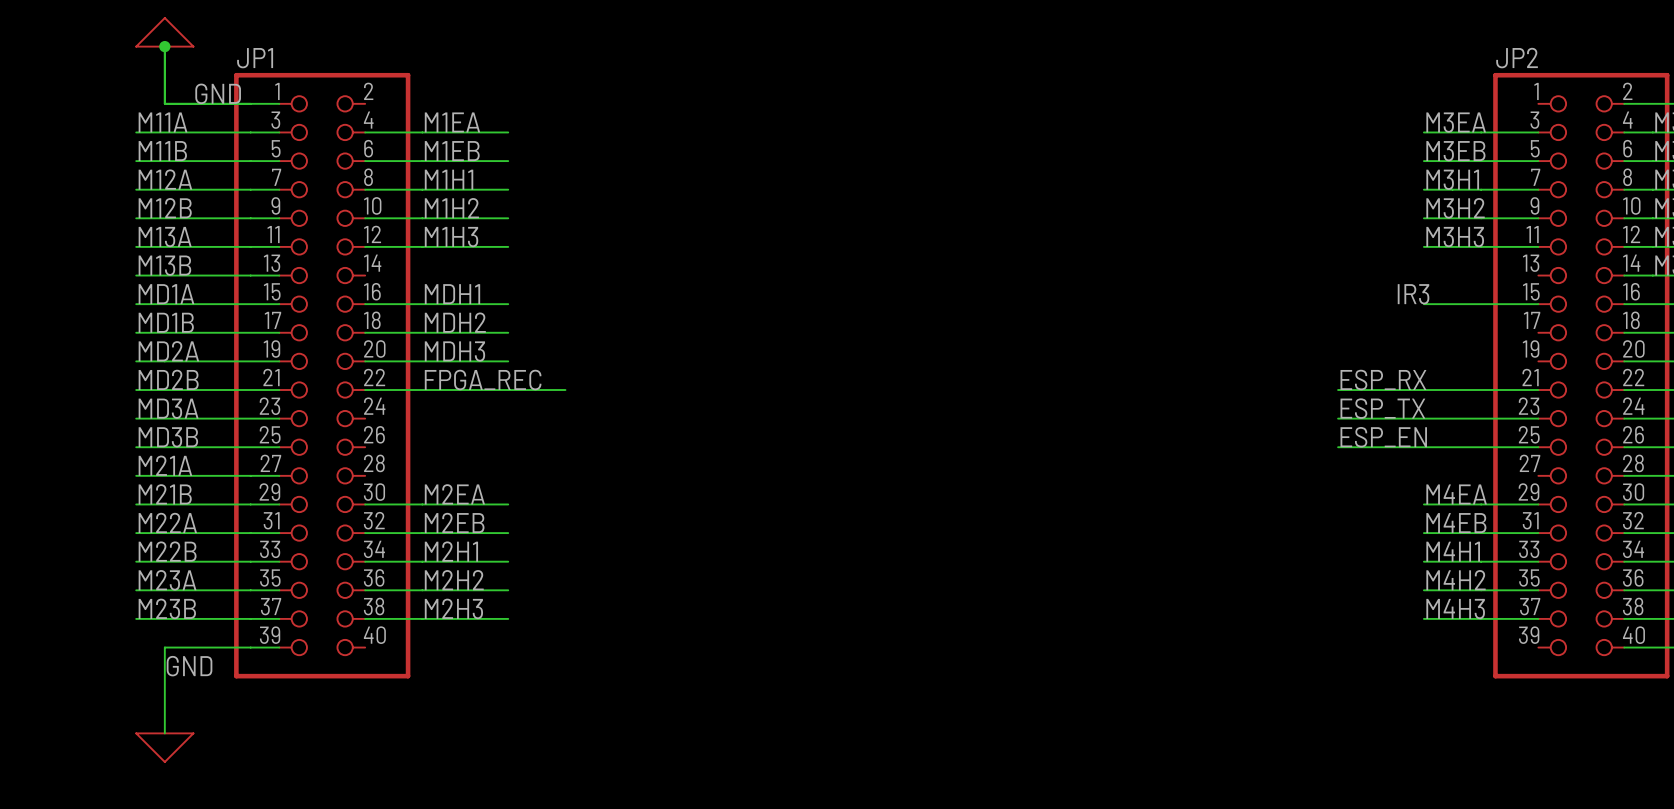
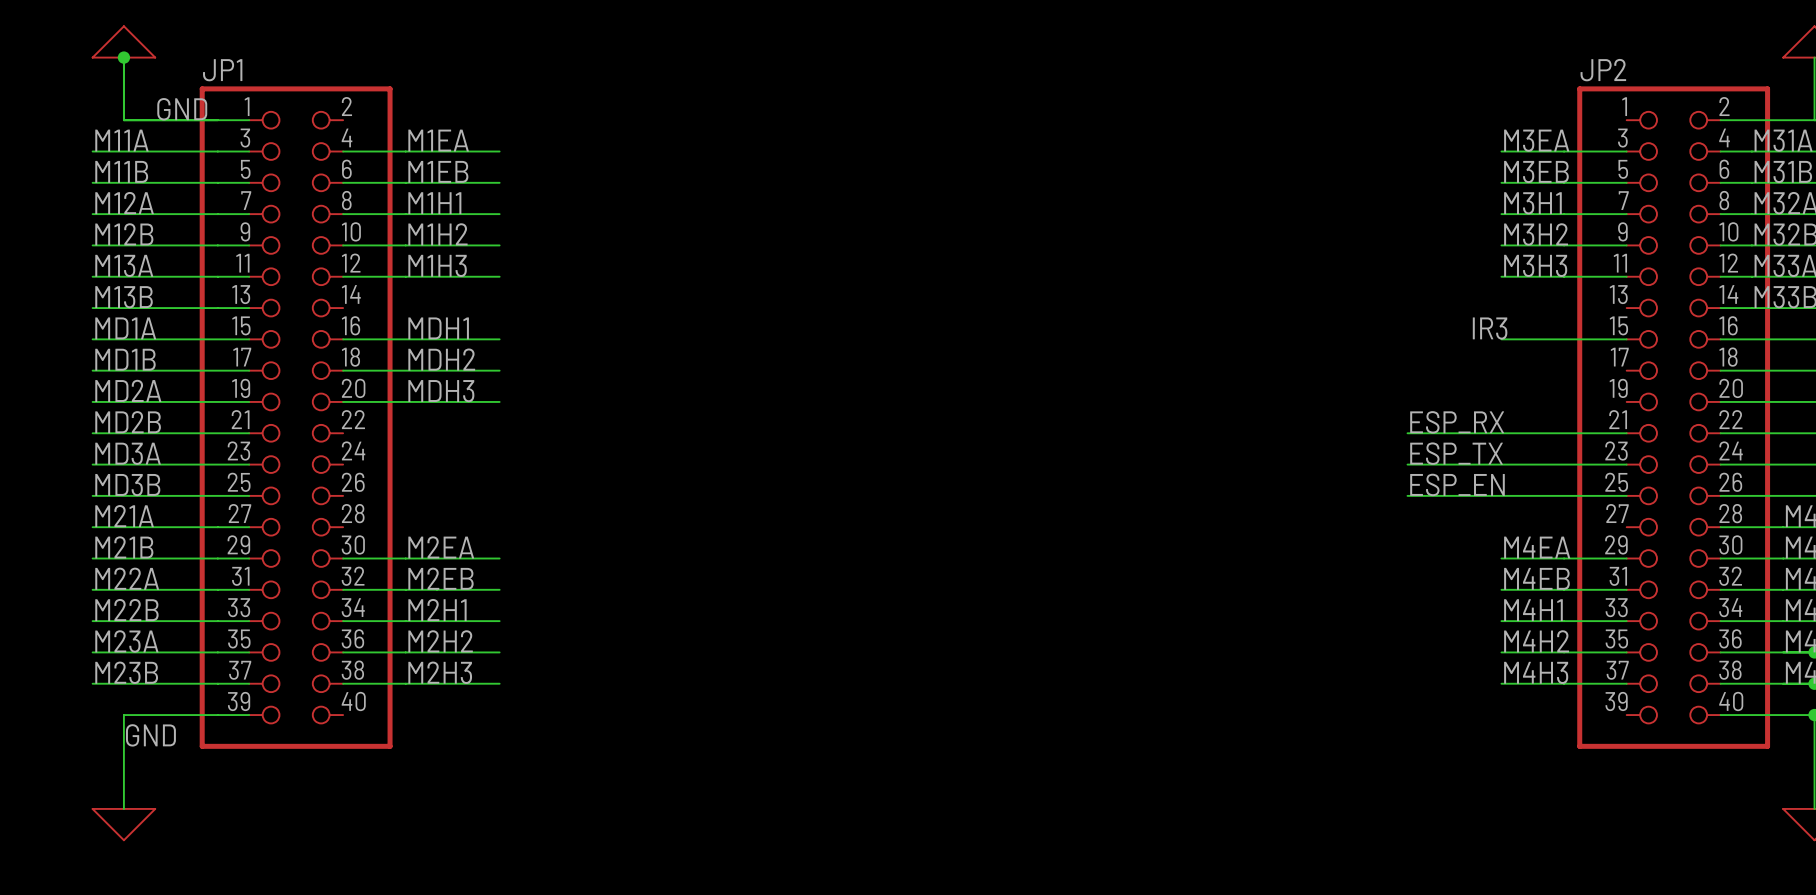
label: FPGA_REC (483, 380) -> none
wire: (365, 390) (565, 390) -> none

